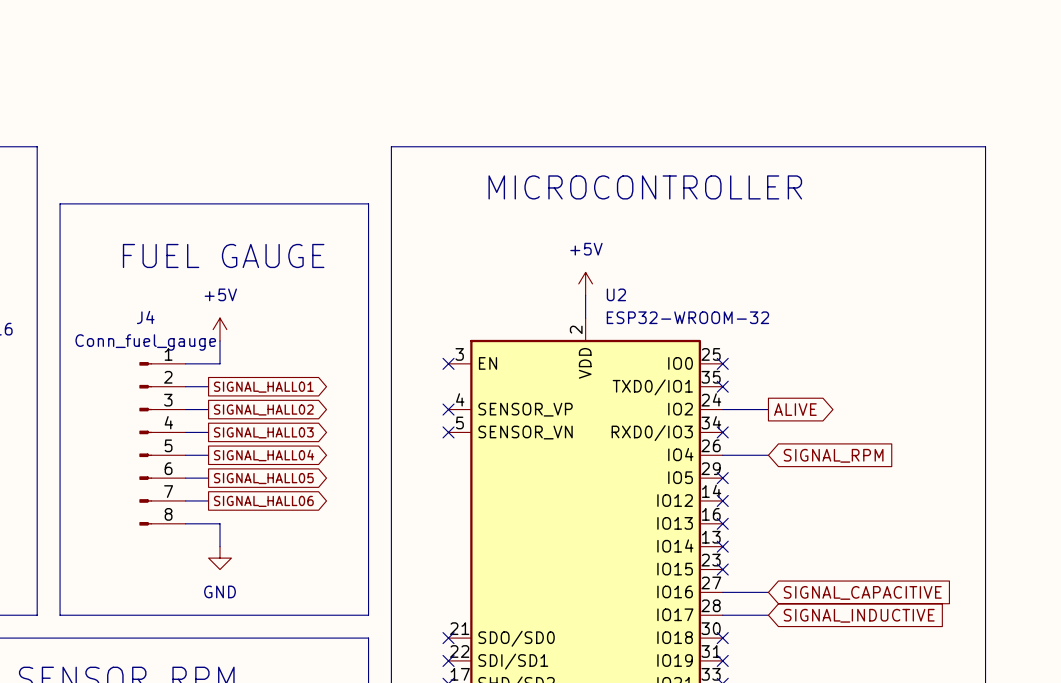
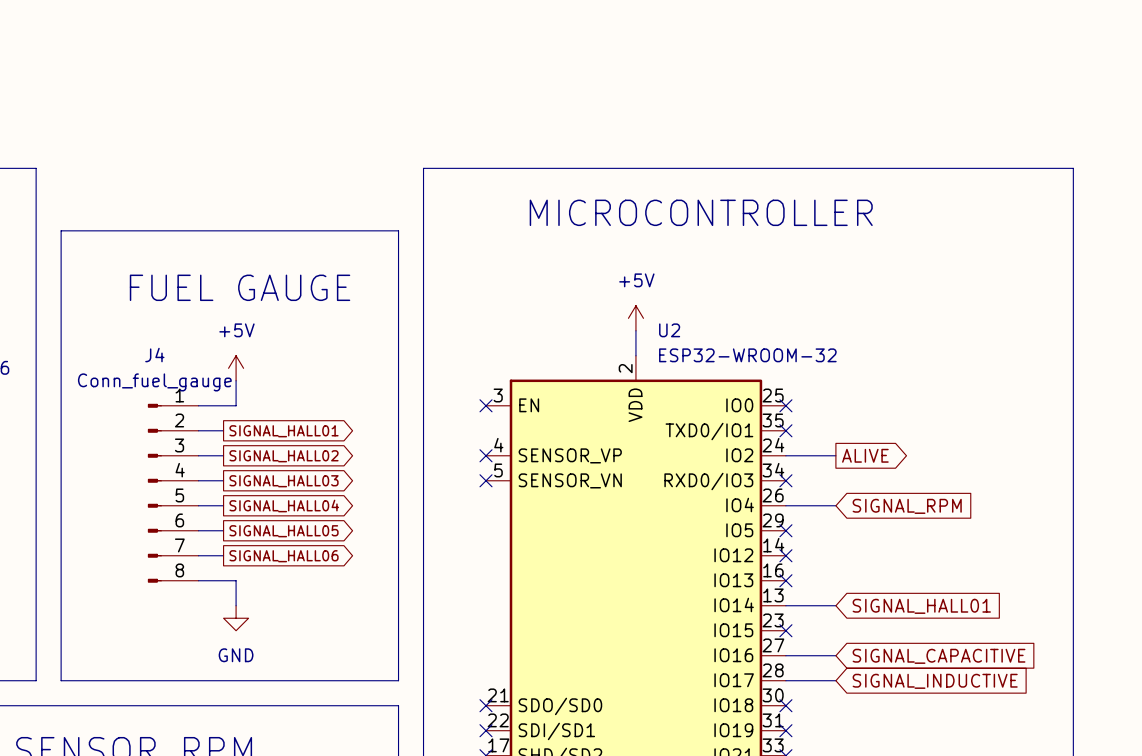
wire: none -> (785, 605) (835, 605)
no-connect mark: (722, 546) -> none
global label: none -> SIGNAL_HALL01 (921, 606)

